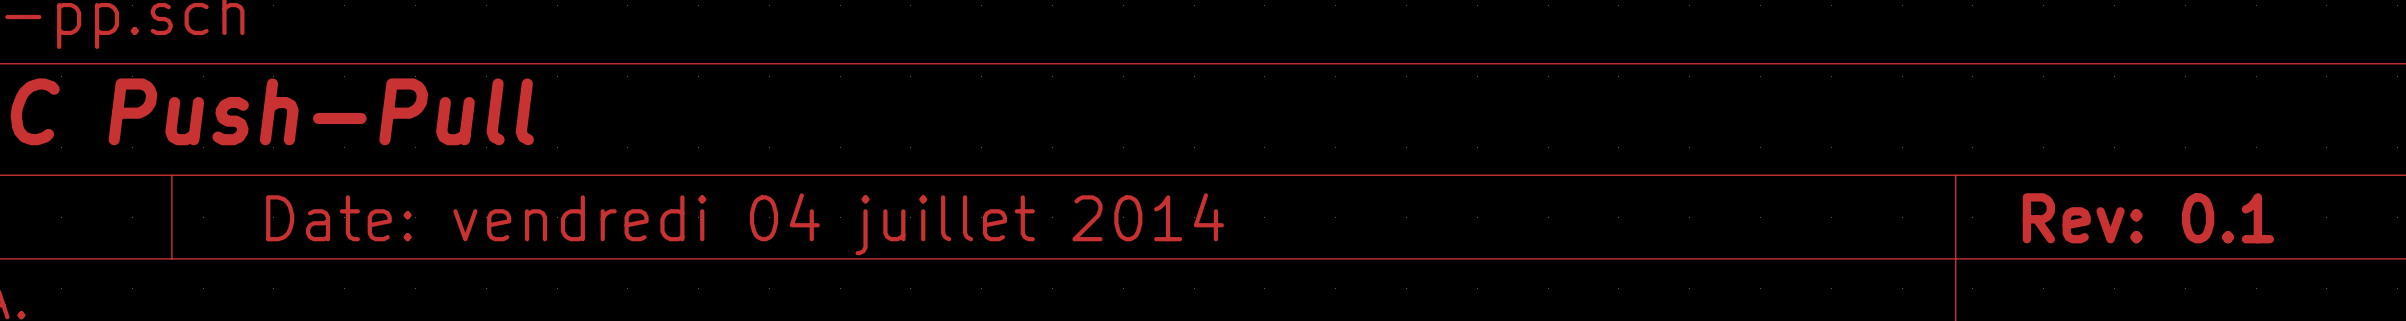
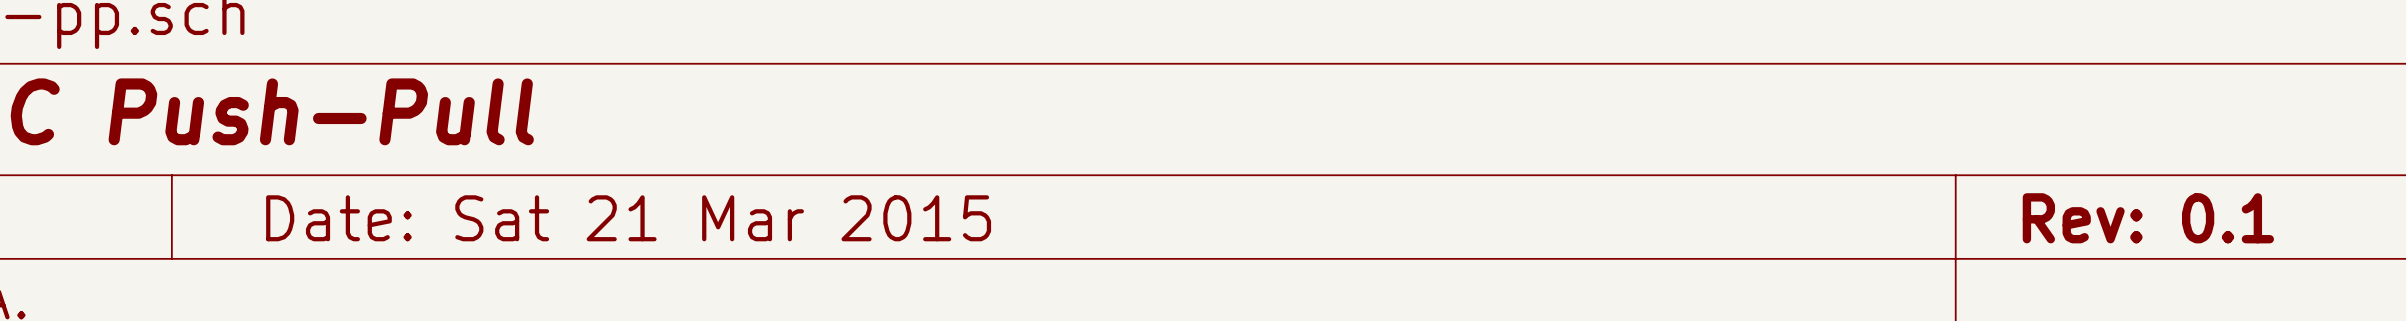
title block: Date: vendredi 04 juillet 2014 (745, 224) -> Date: Sat 21 Mar 2015 (628, 218)

